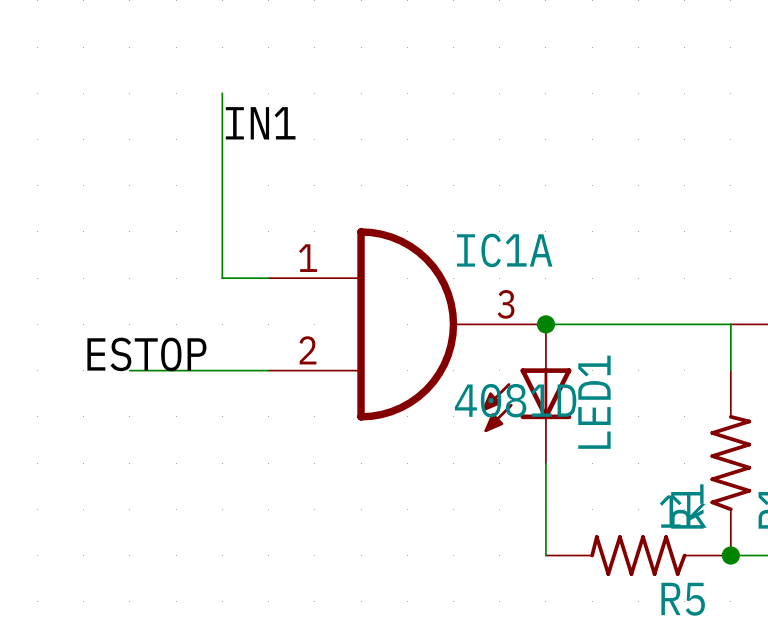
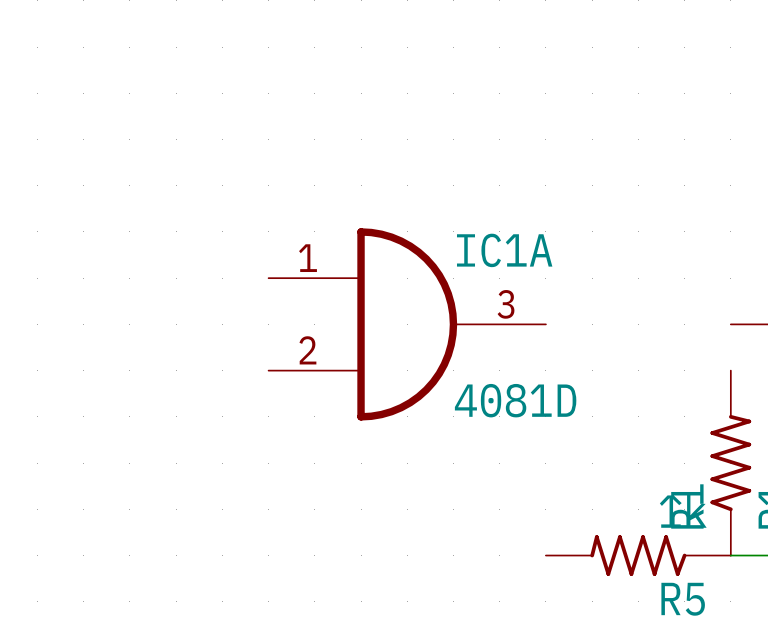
wire: (222, 93) (222, 278) (268, 278) -> none
label: IN1 (260, 123) -> none
wire: (545, 324) (730, 324) (730, 370) -> none
junction: (545, 324) -> none
label: ESTOP (146, 354) -> none
wire: (129, 370) (268, 370) -> none
LED1: (526, 393) -> none
wire: (545, 463) (545, 555) -> none
junction: (730, 555) -> none

